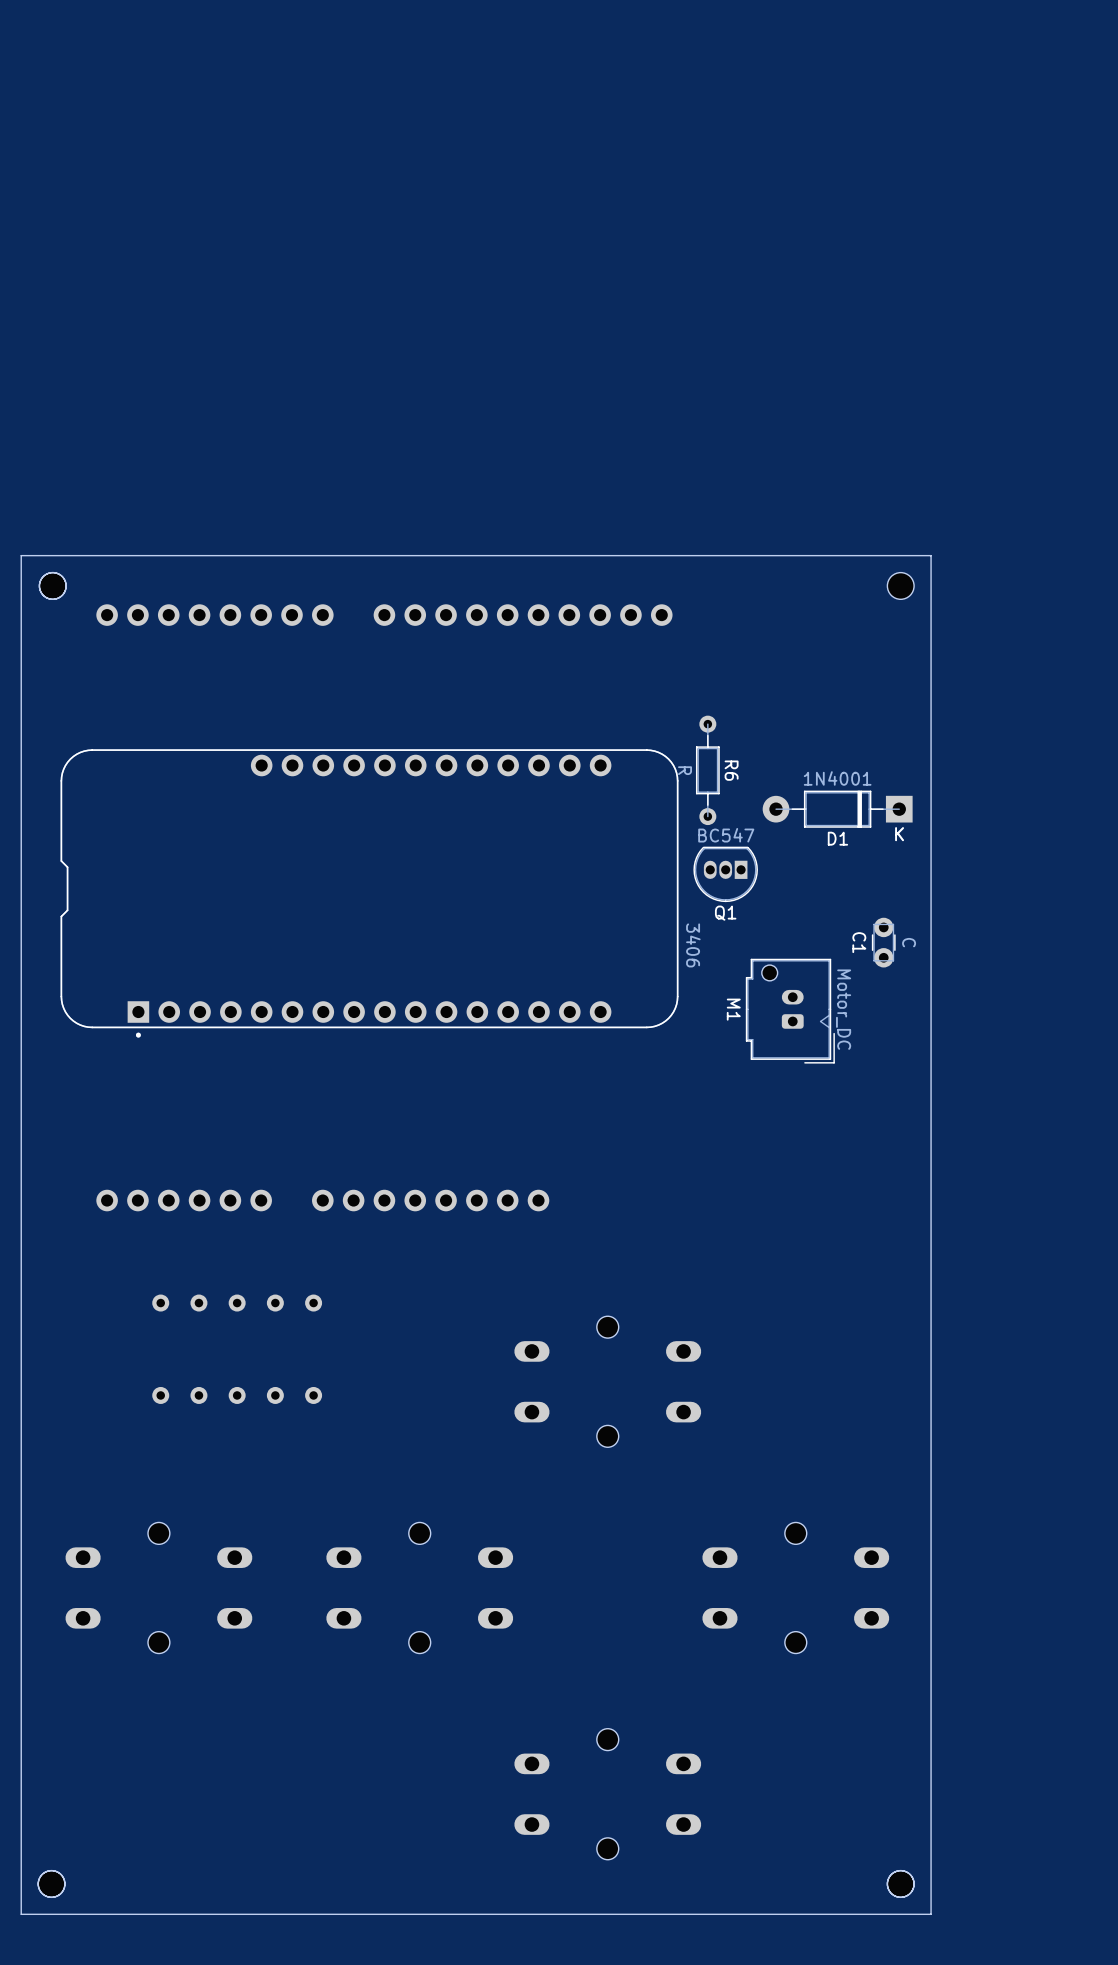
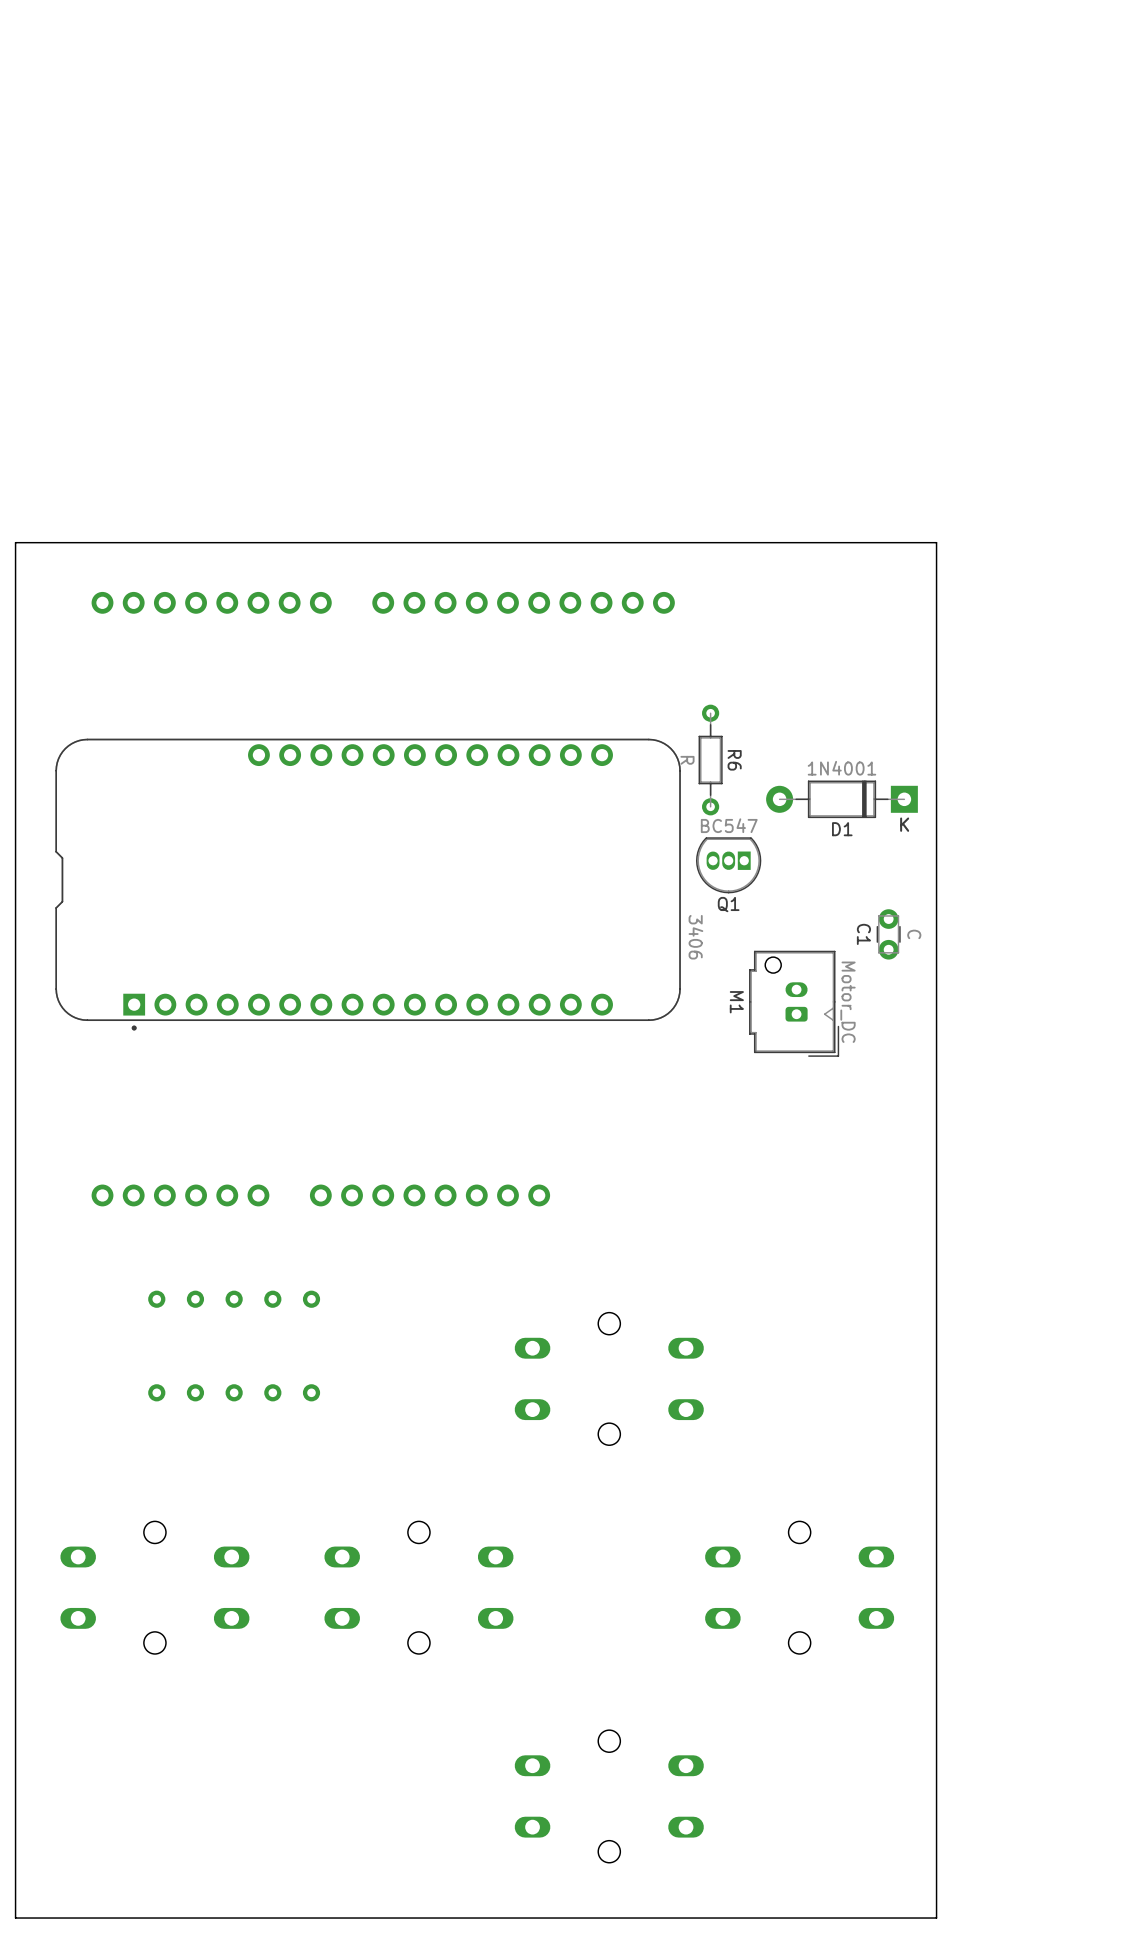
part: (52, 585) -> none
part: (900, 585) -> none
part: (51, 1883) -> none
part: (900, 1883) -> none

